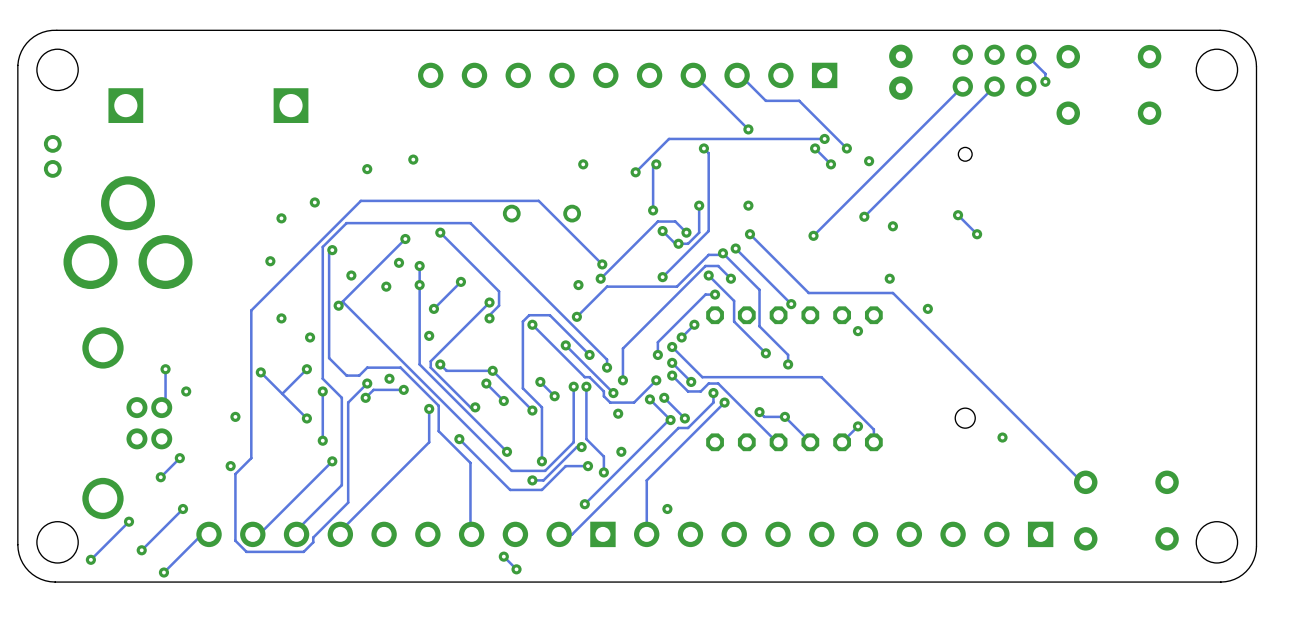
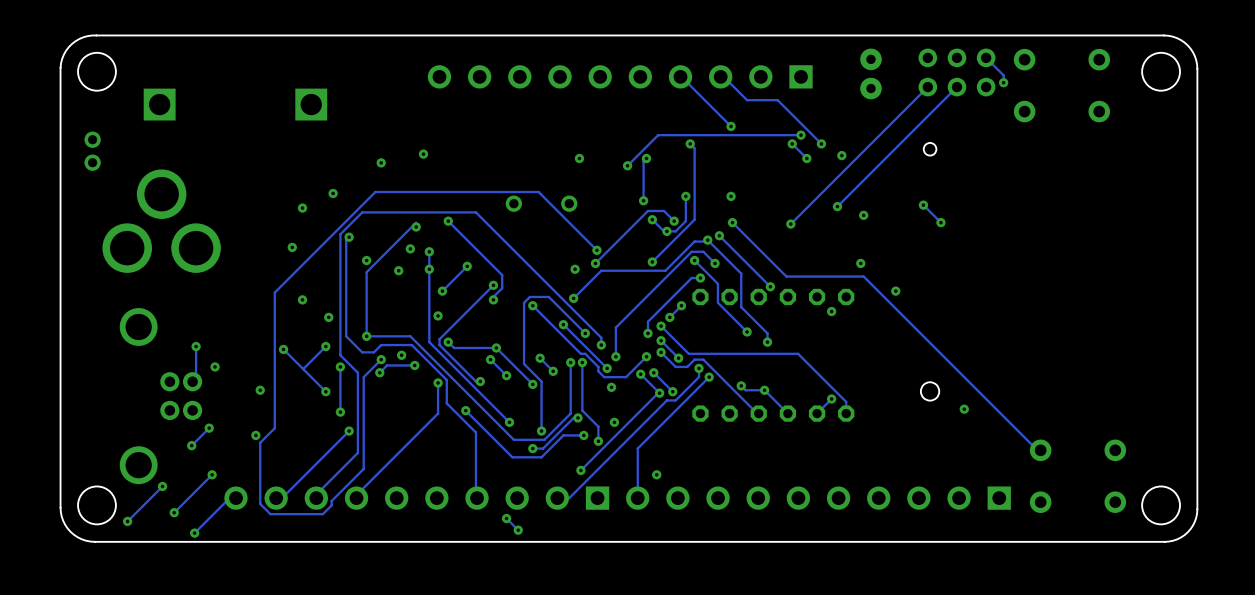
track: (405, 239) (338, 305) -> none
track: (342, 301) (399, 358) -> (416, 222) (366, 272) (366, 336) (410, 336)
via position: (338, 305) -> (366, 336)

